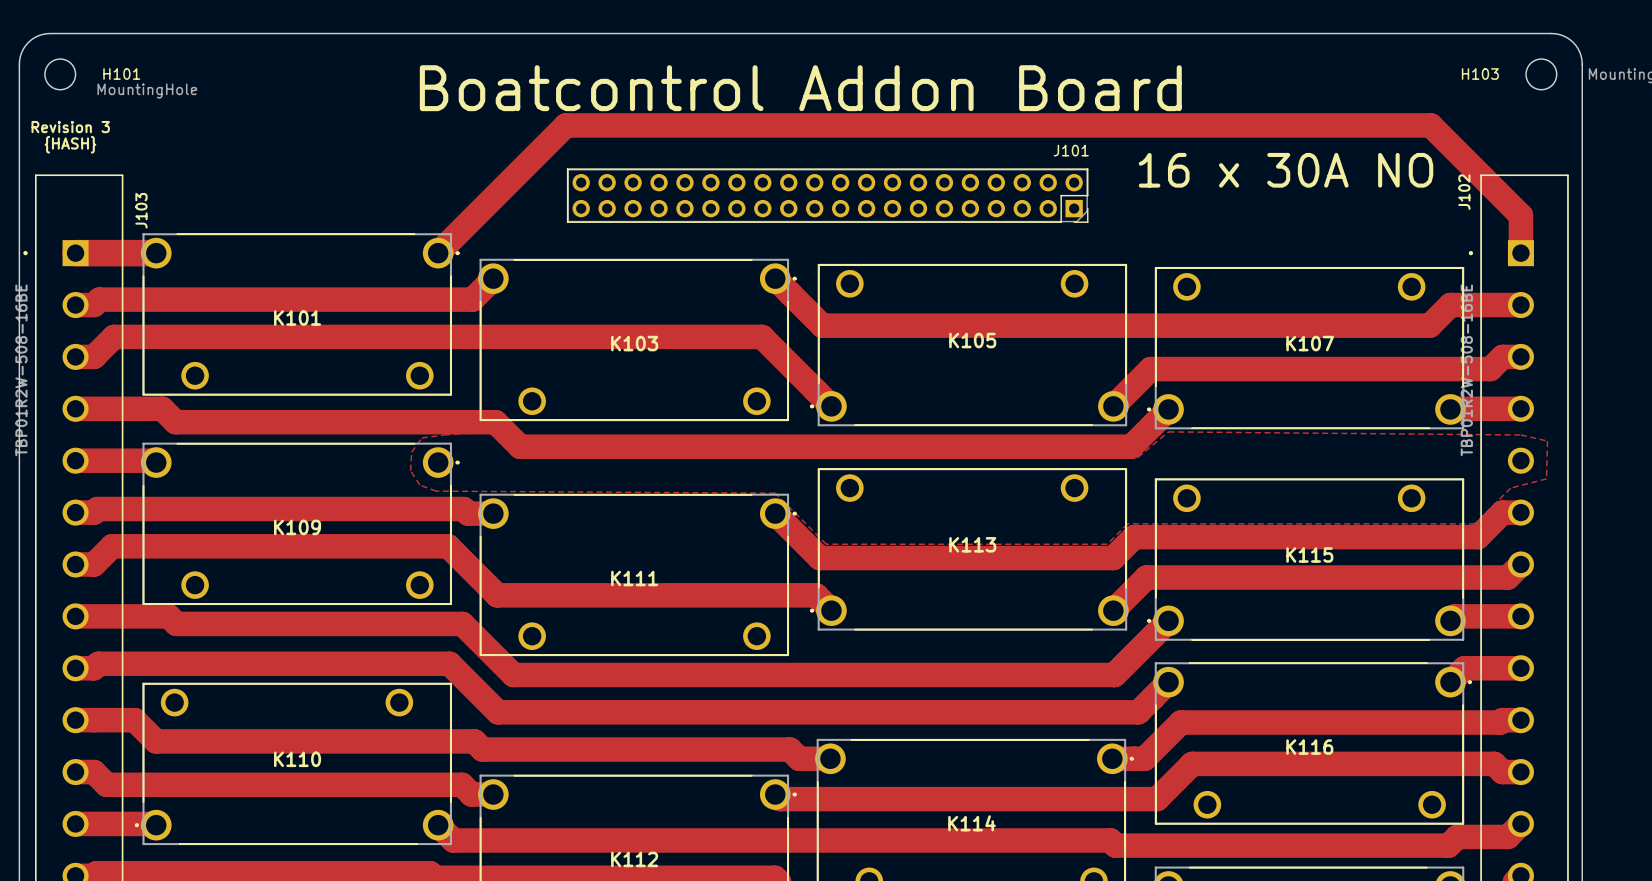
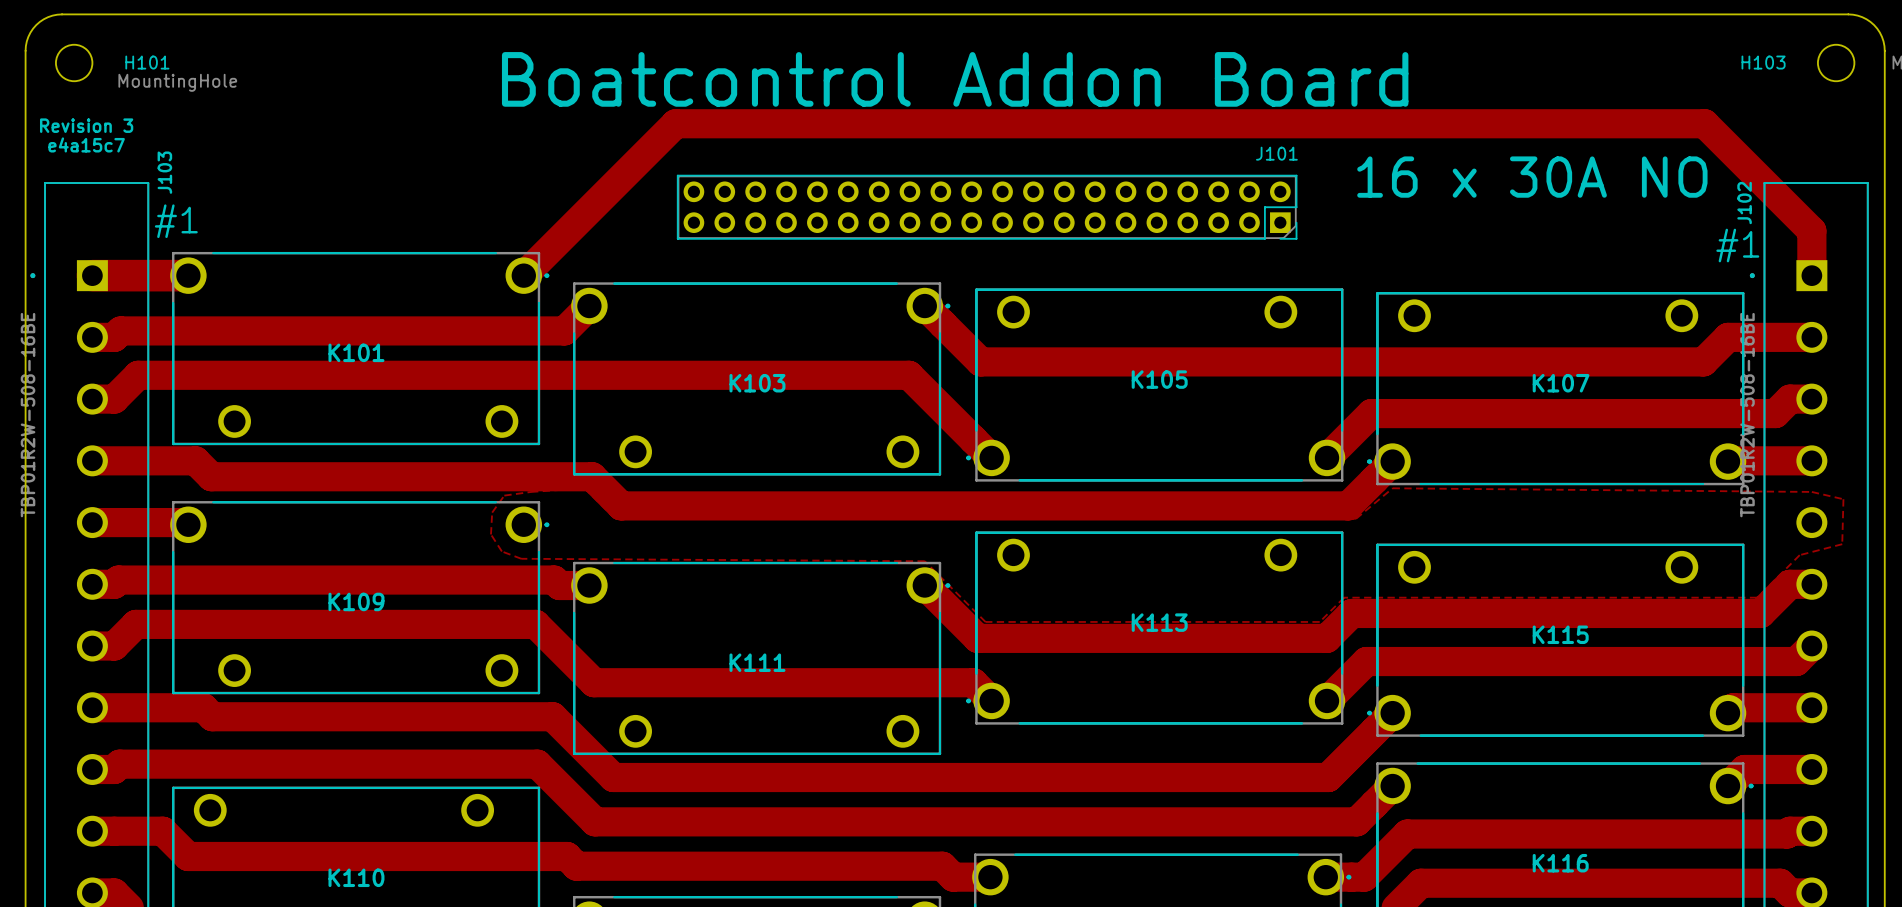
text: {HASH} (70, 144) -> e4a15c7 (86, 144)
text: none -> #1 (176, 221)
J103 name position: J103 (141, 210) -> J103 (164, 172)
text: none -> #1 (1737, 245)

